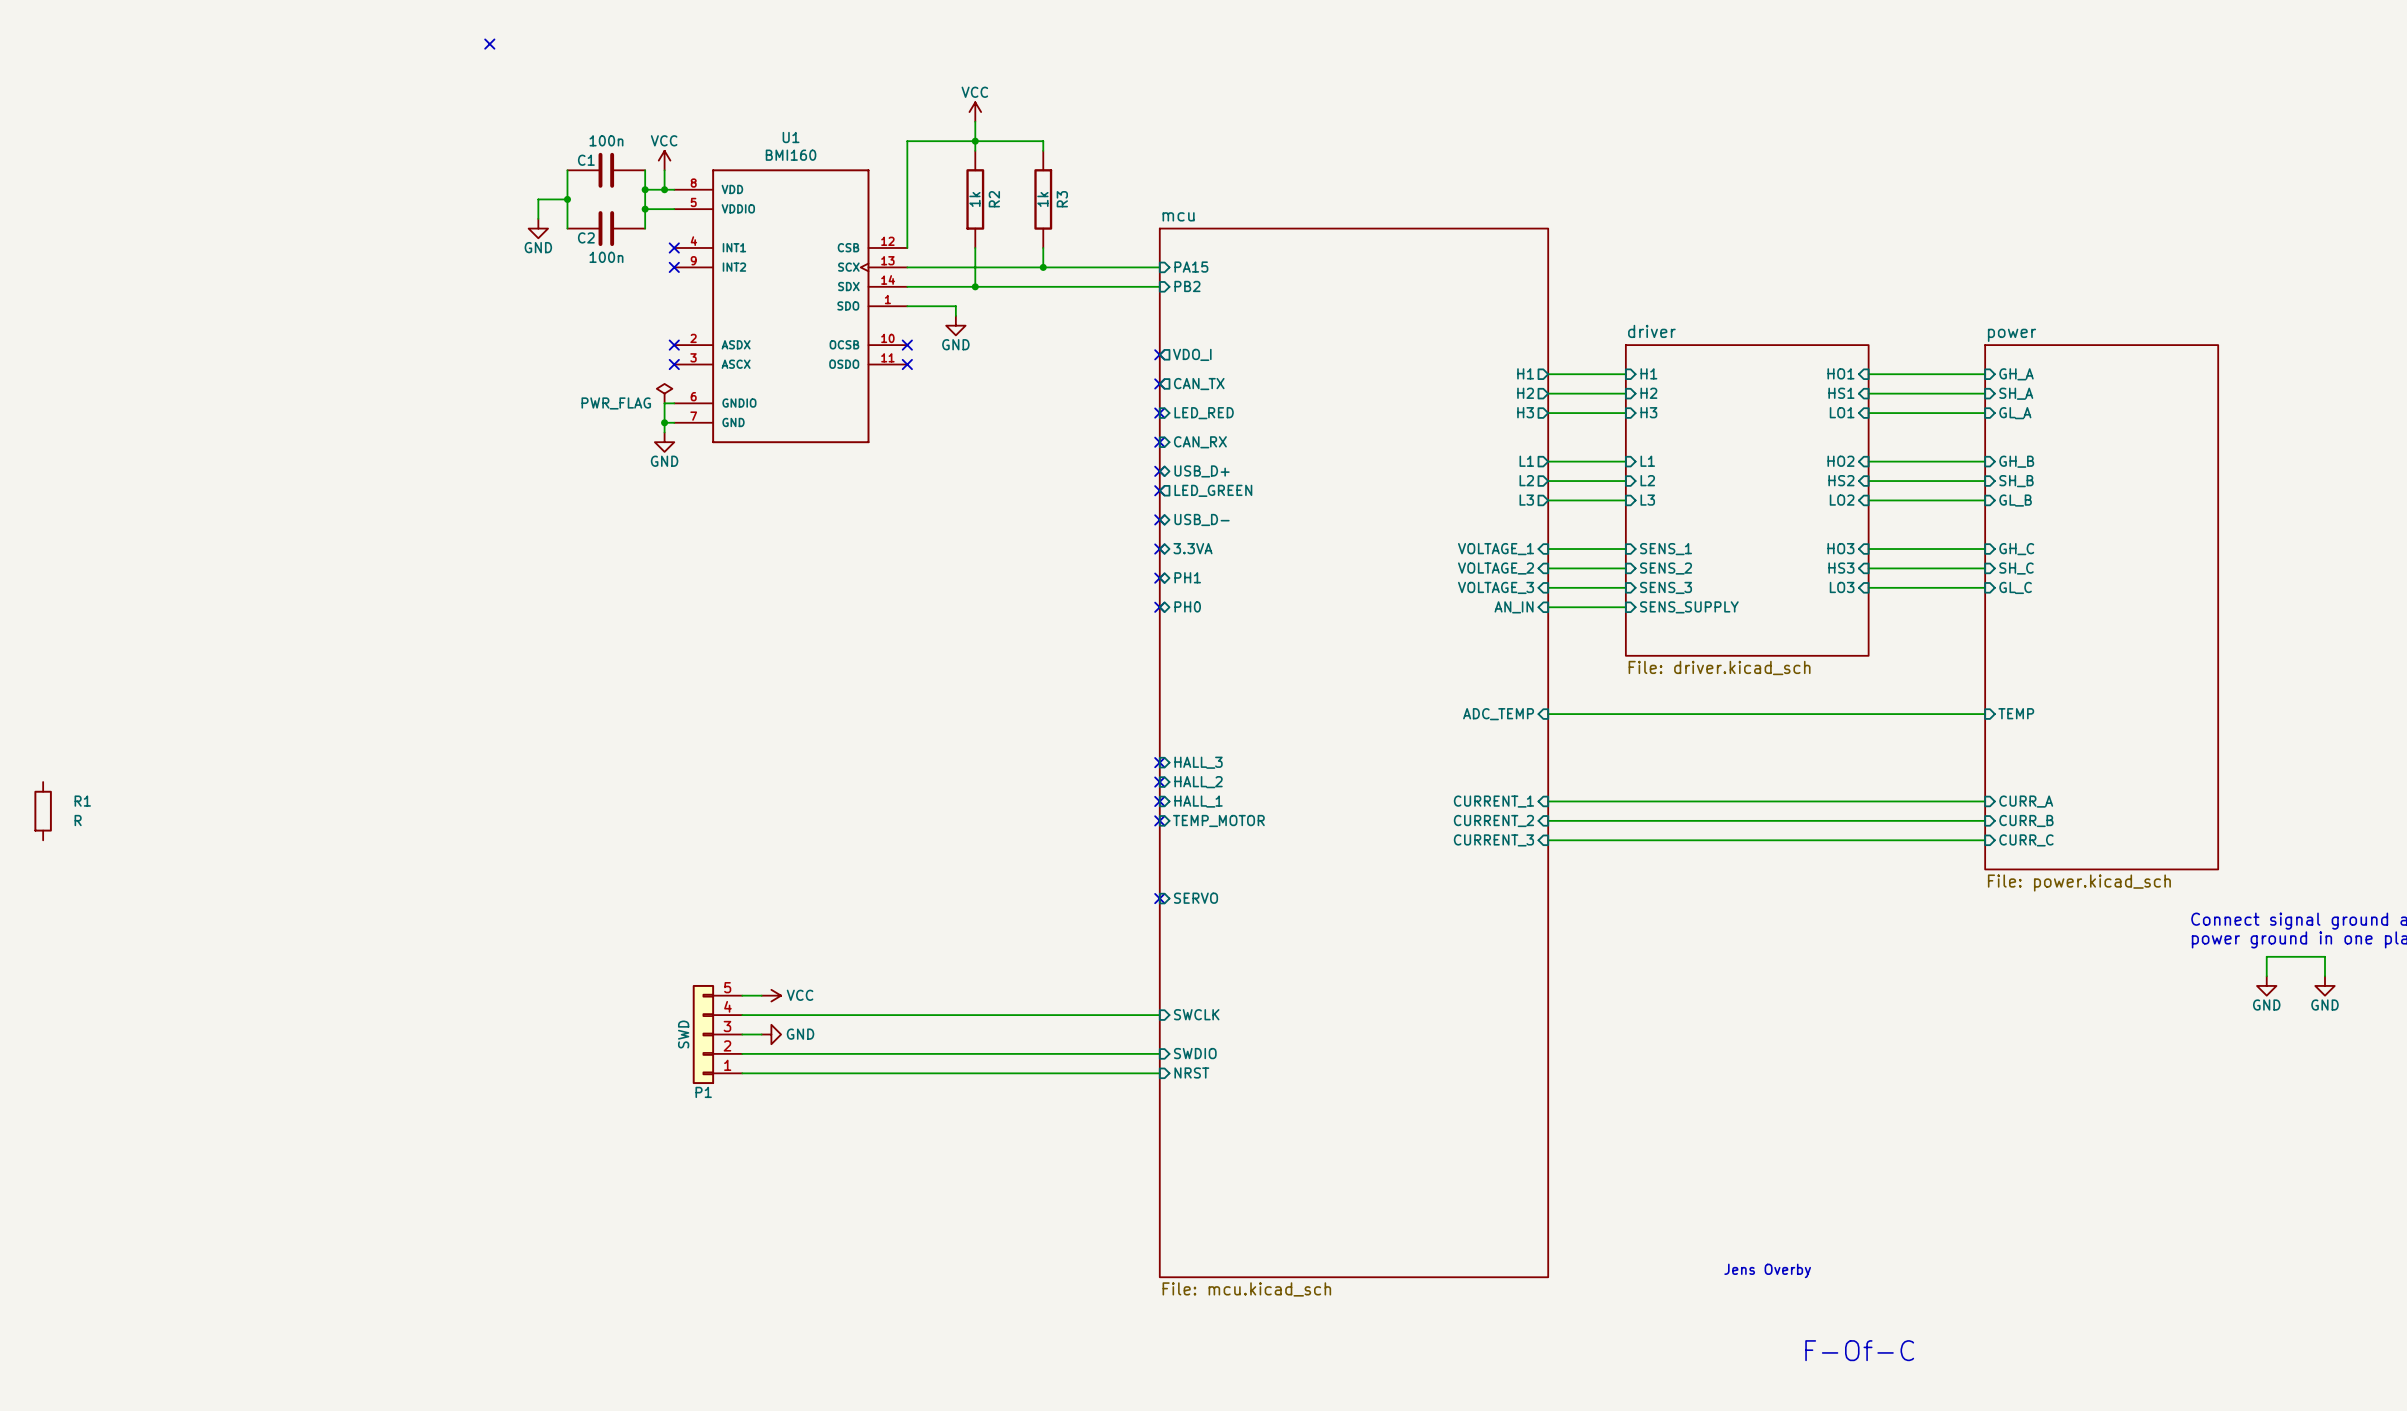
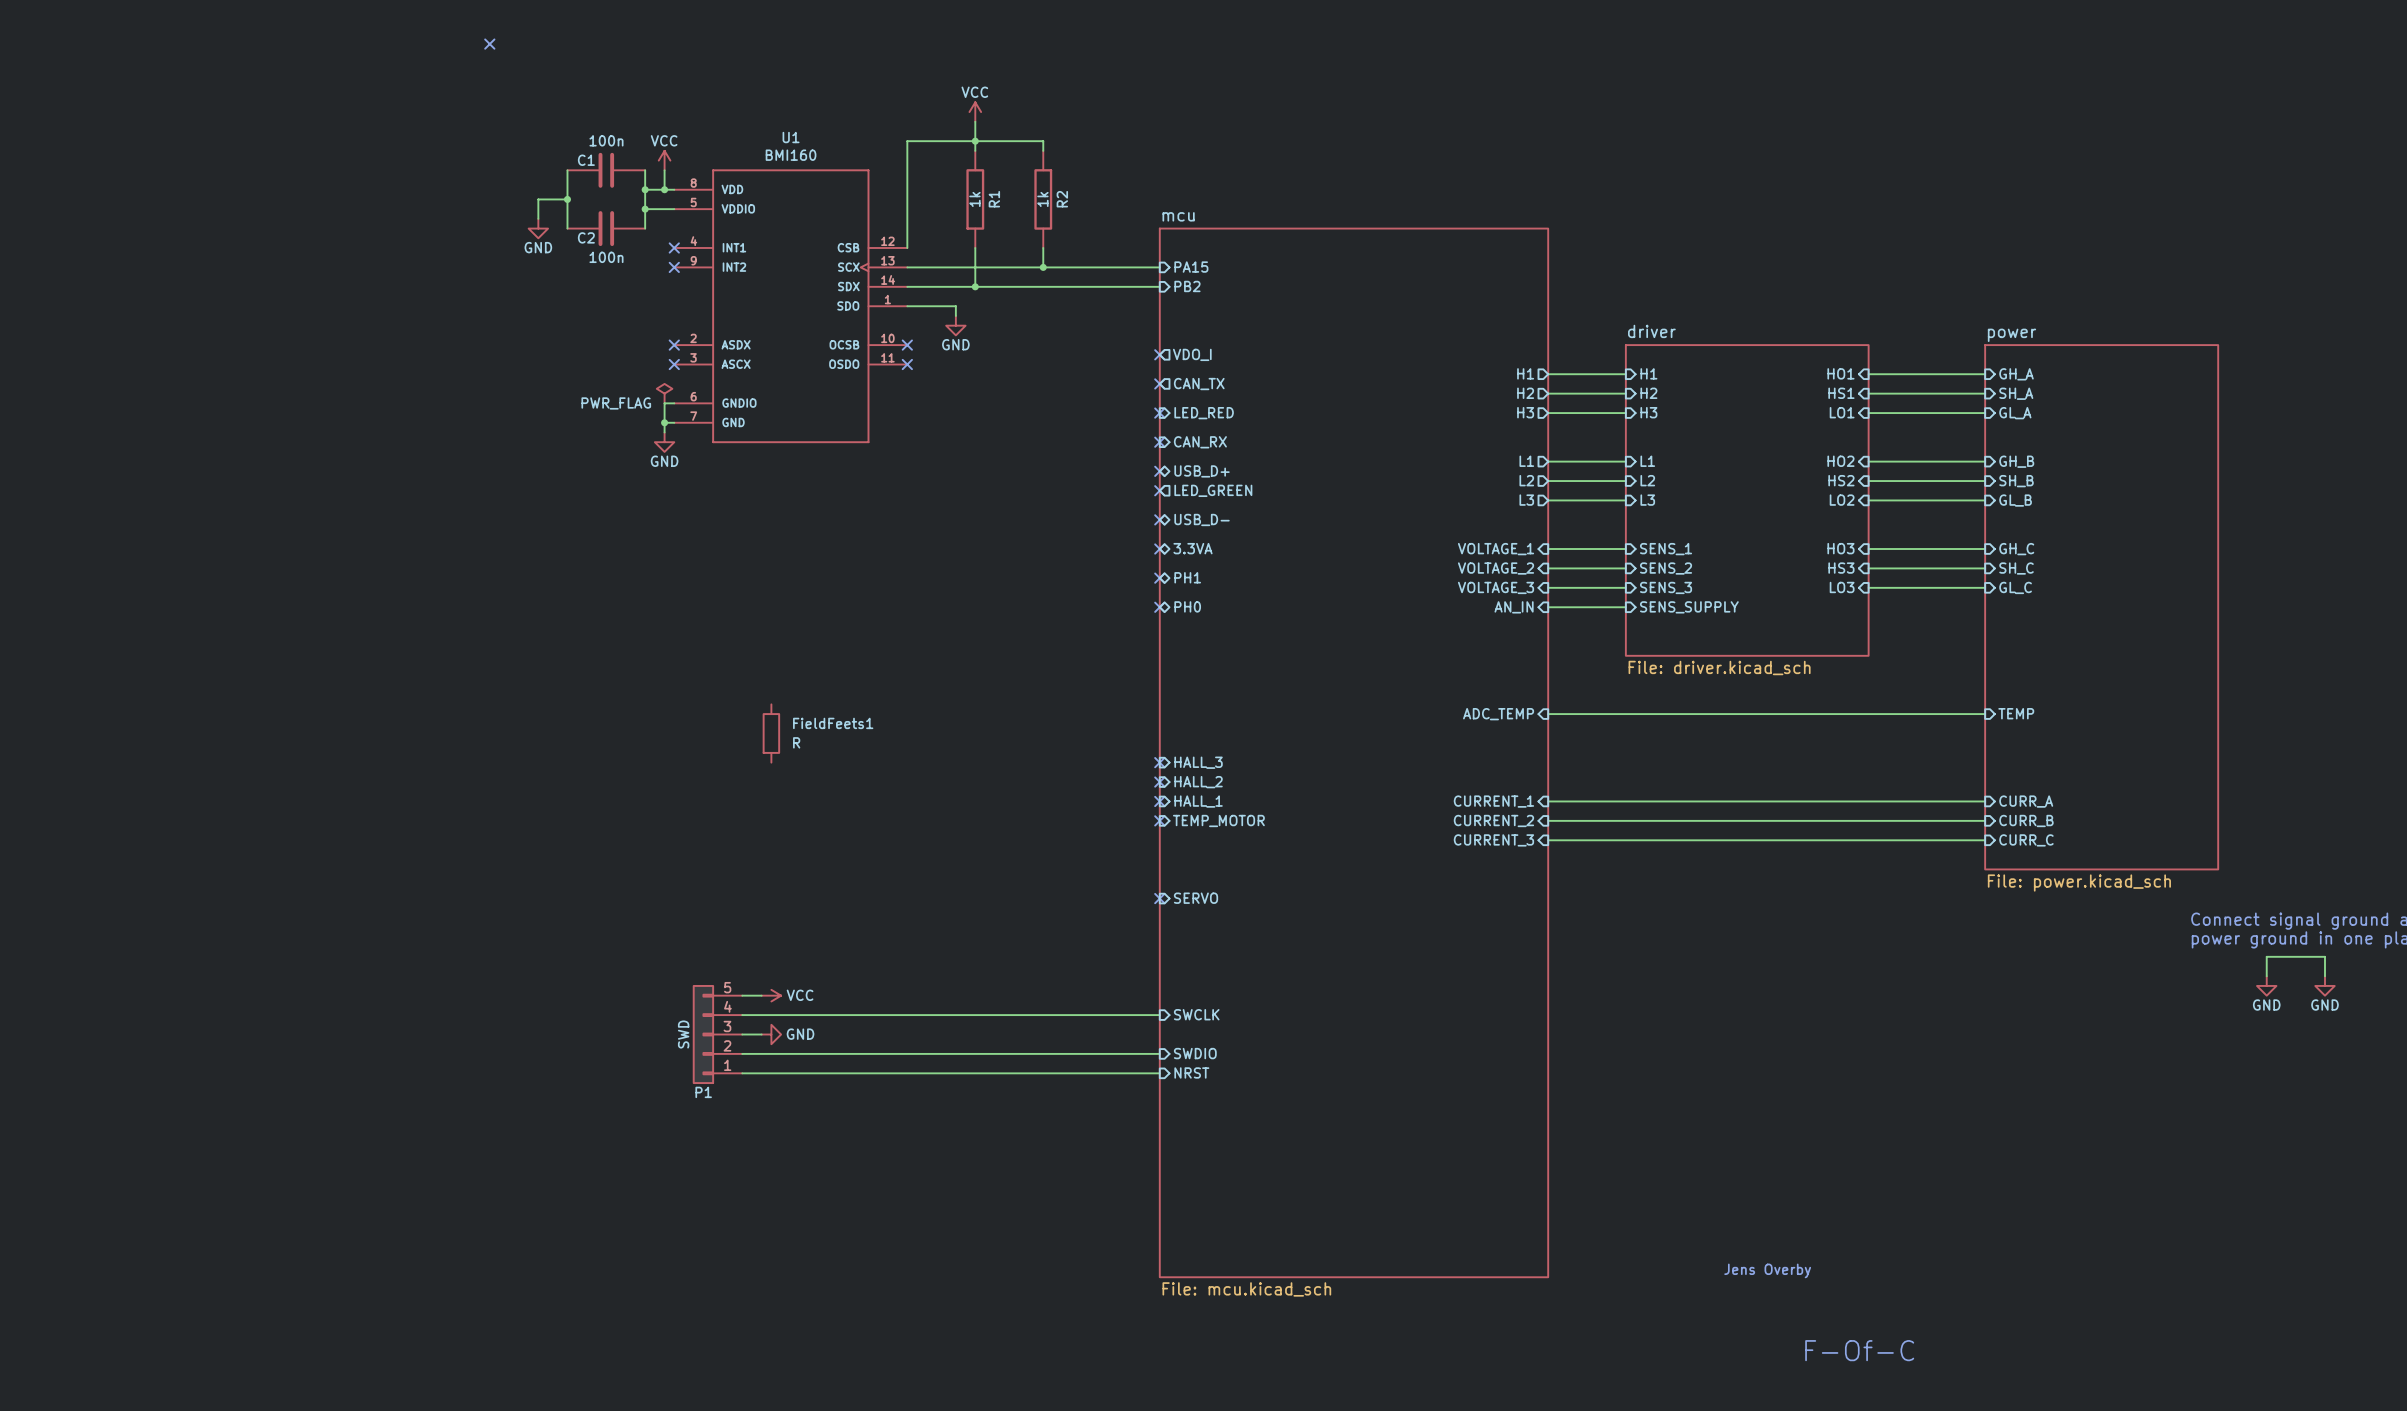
R2 name: R2 (994, 199) -> R1 (994, 199)
R3 name: R3 (1062, 199) -> R2 (1062, 199)
FieldFeets1: none -> R (771, 733)
R1: R (43, 811) -> none

